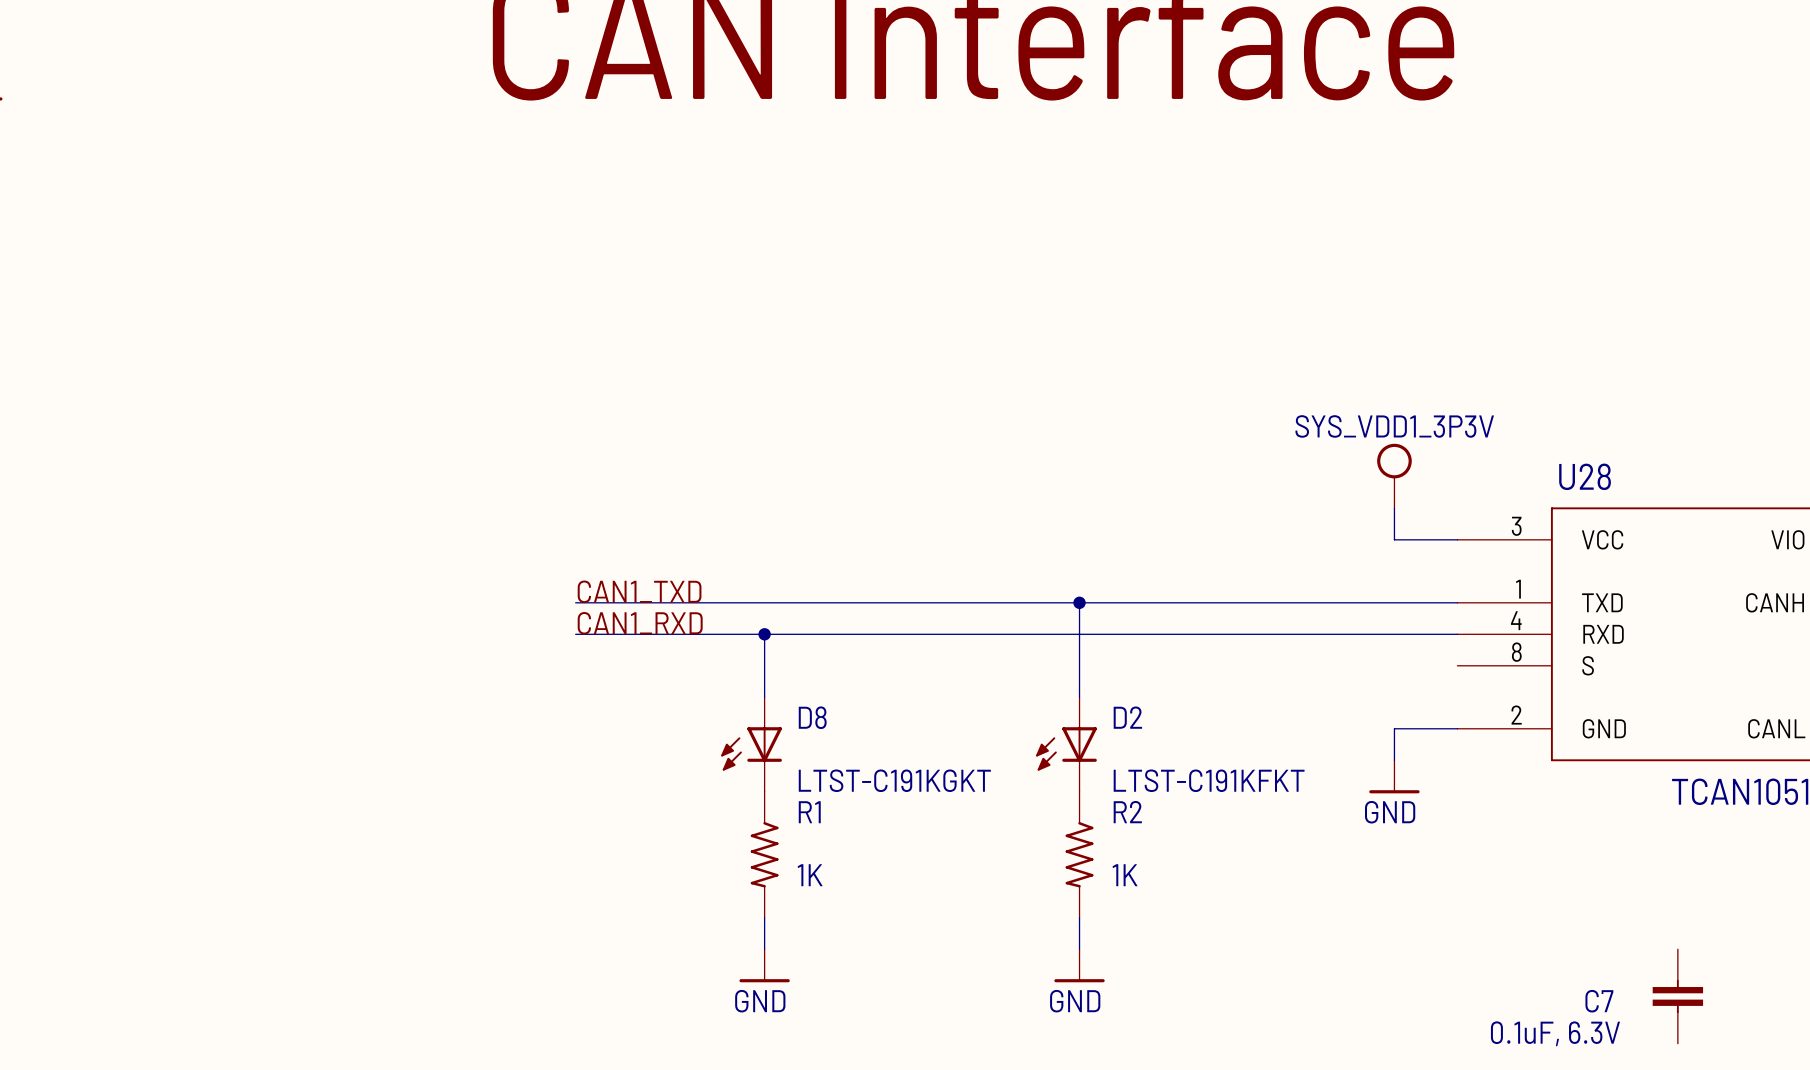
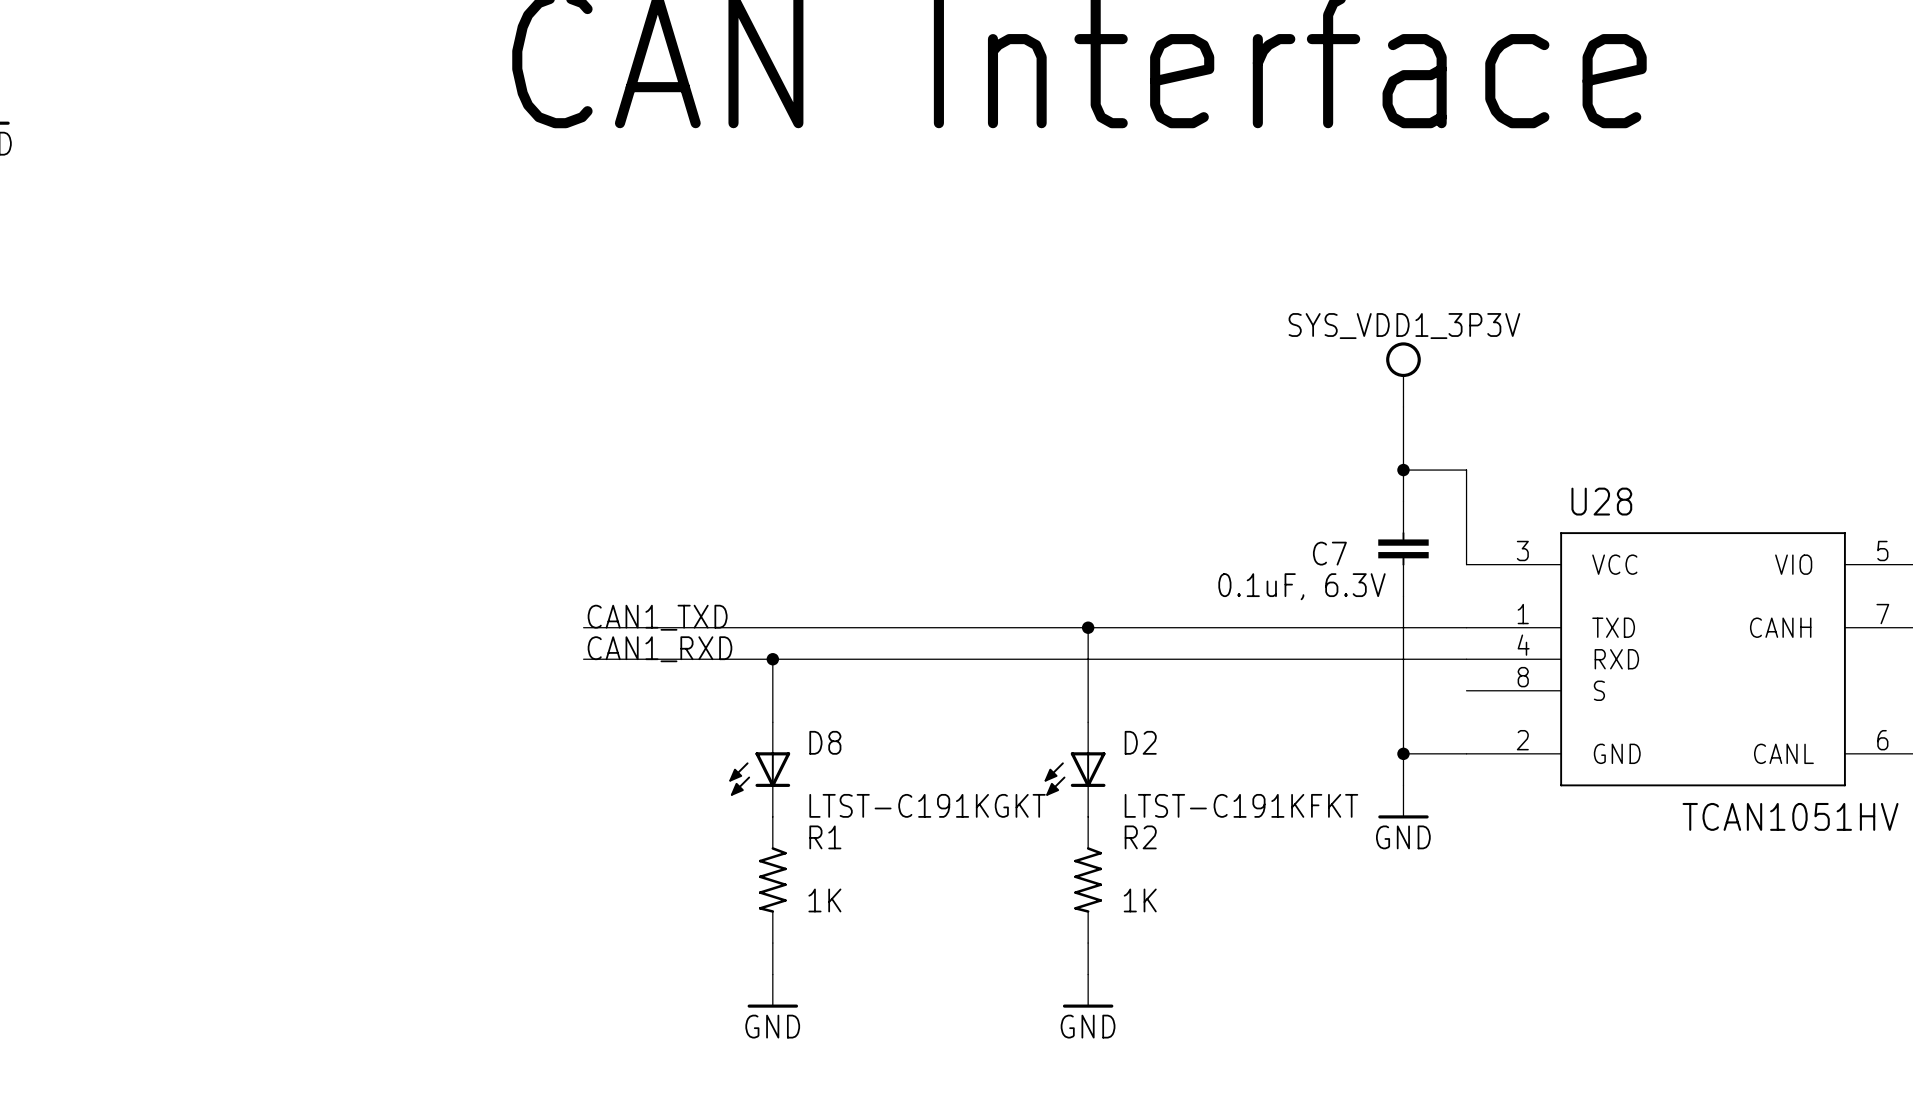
wire: none -> (1403, 406) (1403, 501)
junction: none -> (1403, 470)
power symbol position: SYS_VDD1_3P3V (1394, 476) -> SYS_VDD1_3P3V (1403, 374)
wire: (1394, 508) (1394, 539) (1457, 539) -> (1403, 470) (1466, 470) (1466, 564)
wire: none -> (1403, 596) (1403, 753)
junction: none -> (1403, 753)
C7 position: (1677, 996) -> (1403, 548)

